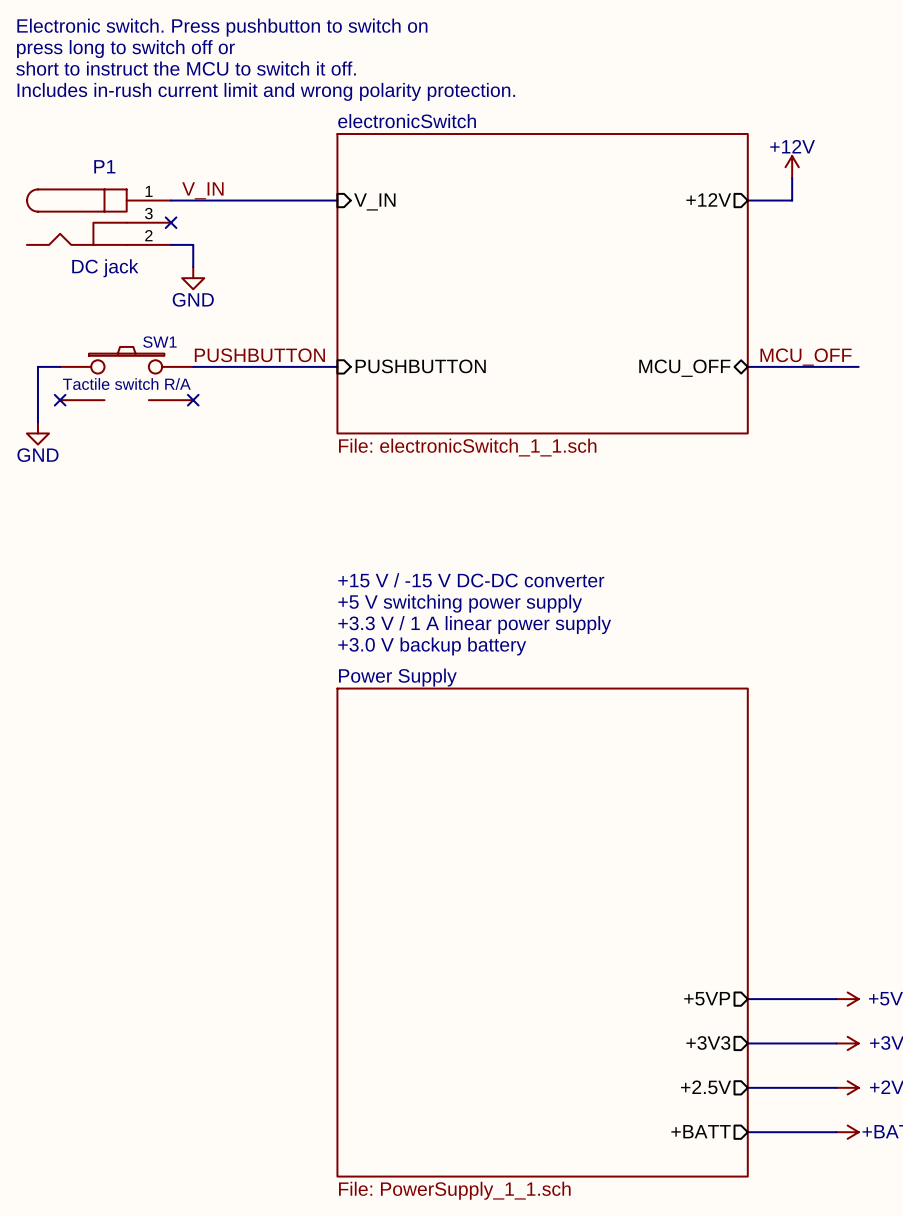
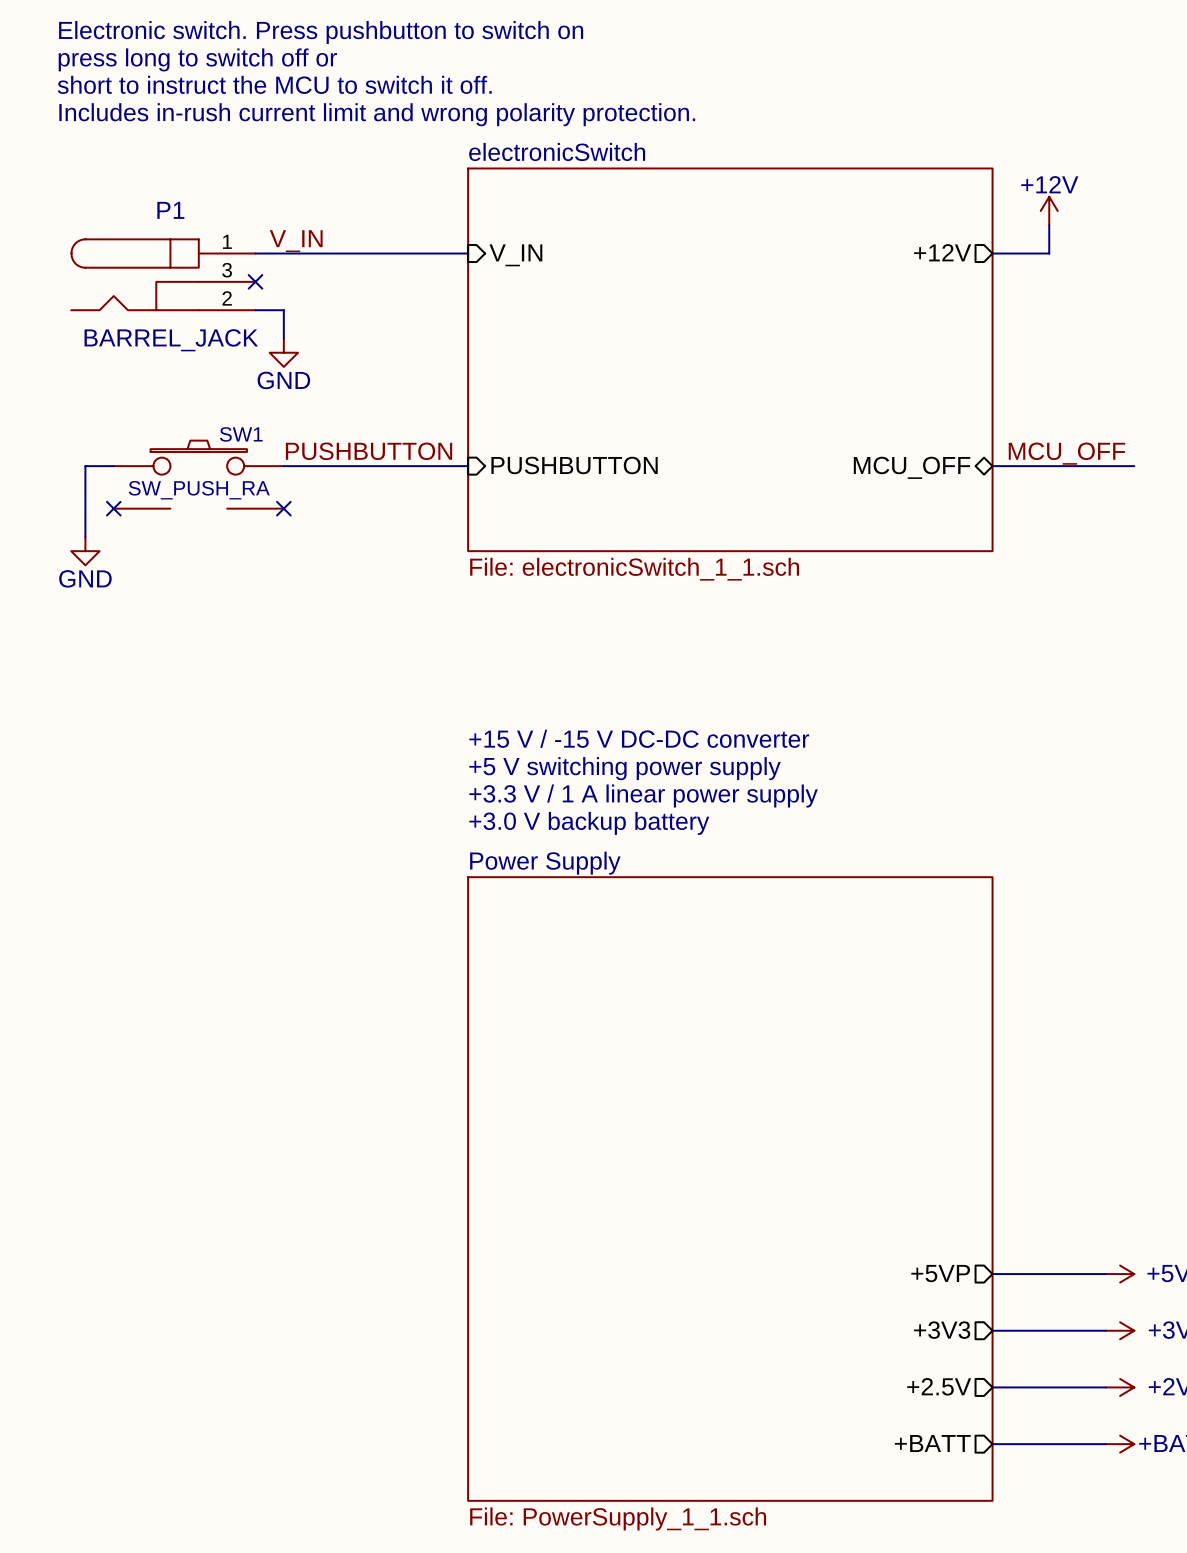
P1 value: DC jack (105, 268) -> BARREL_JACK (171, 340)
SW1 value: Tactile switch R/A (126, 384) -> SW_PUSH_RA (199, 490)

